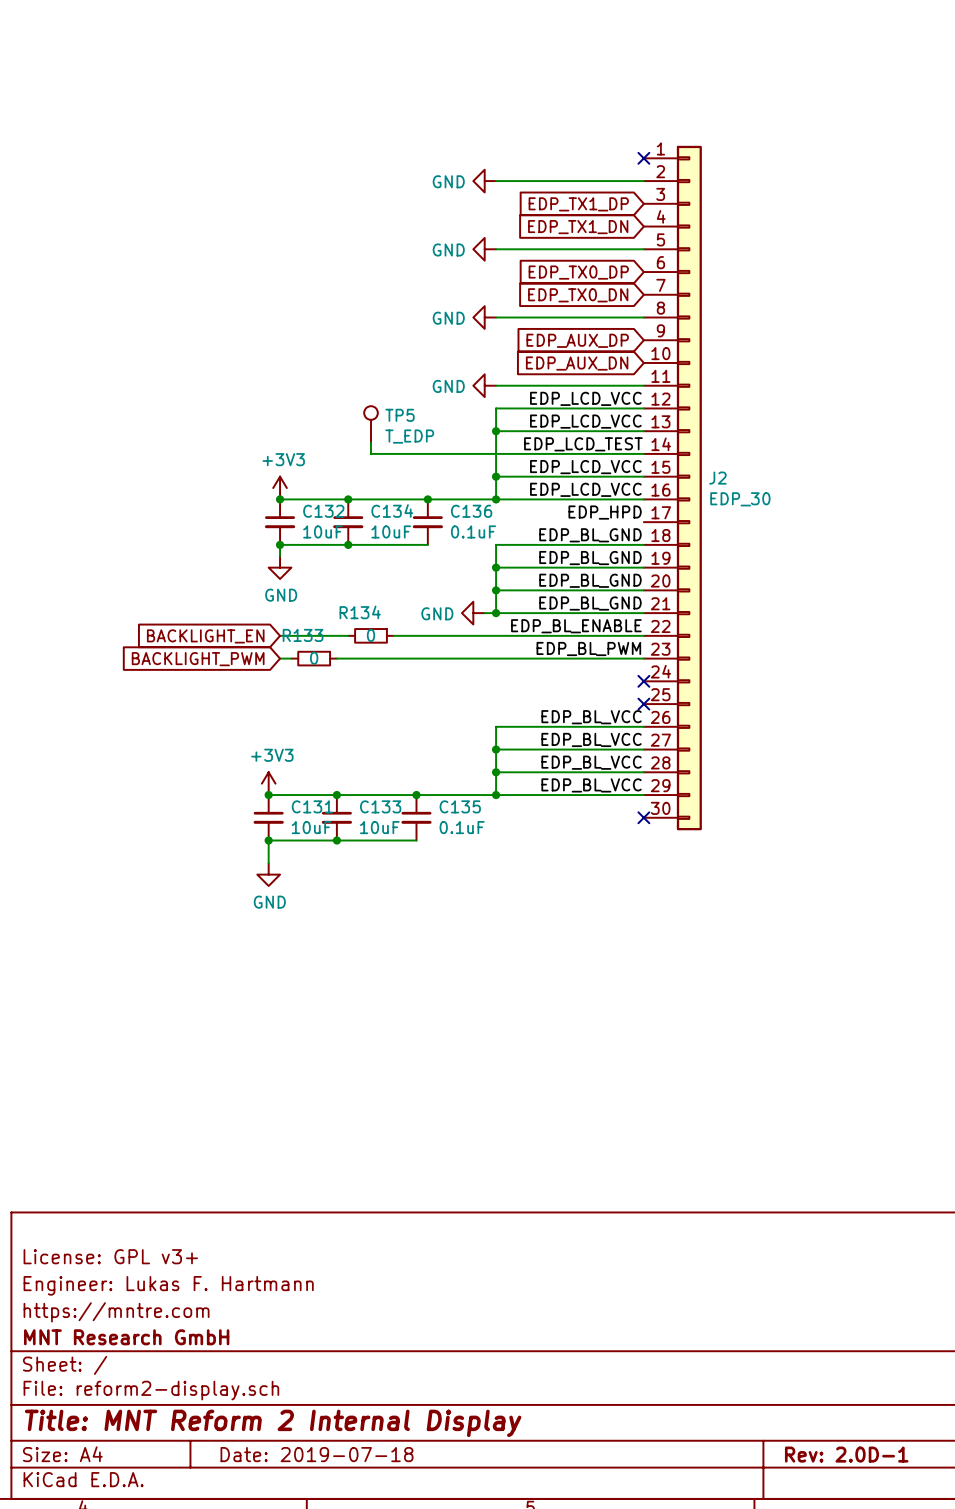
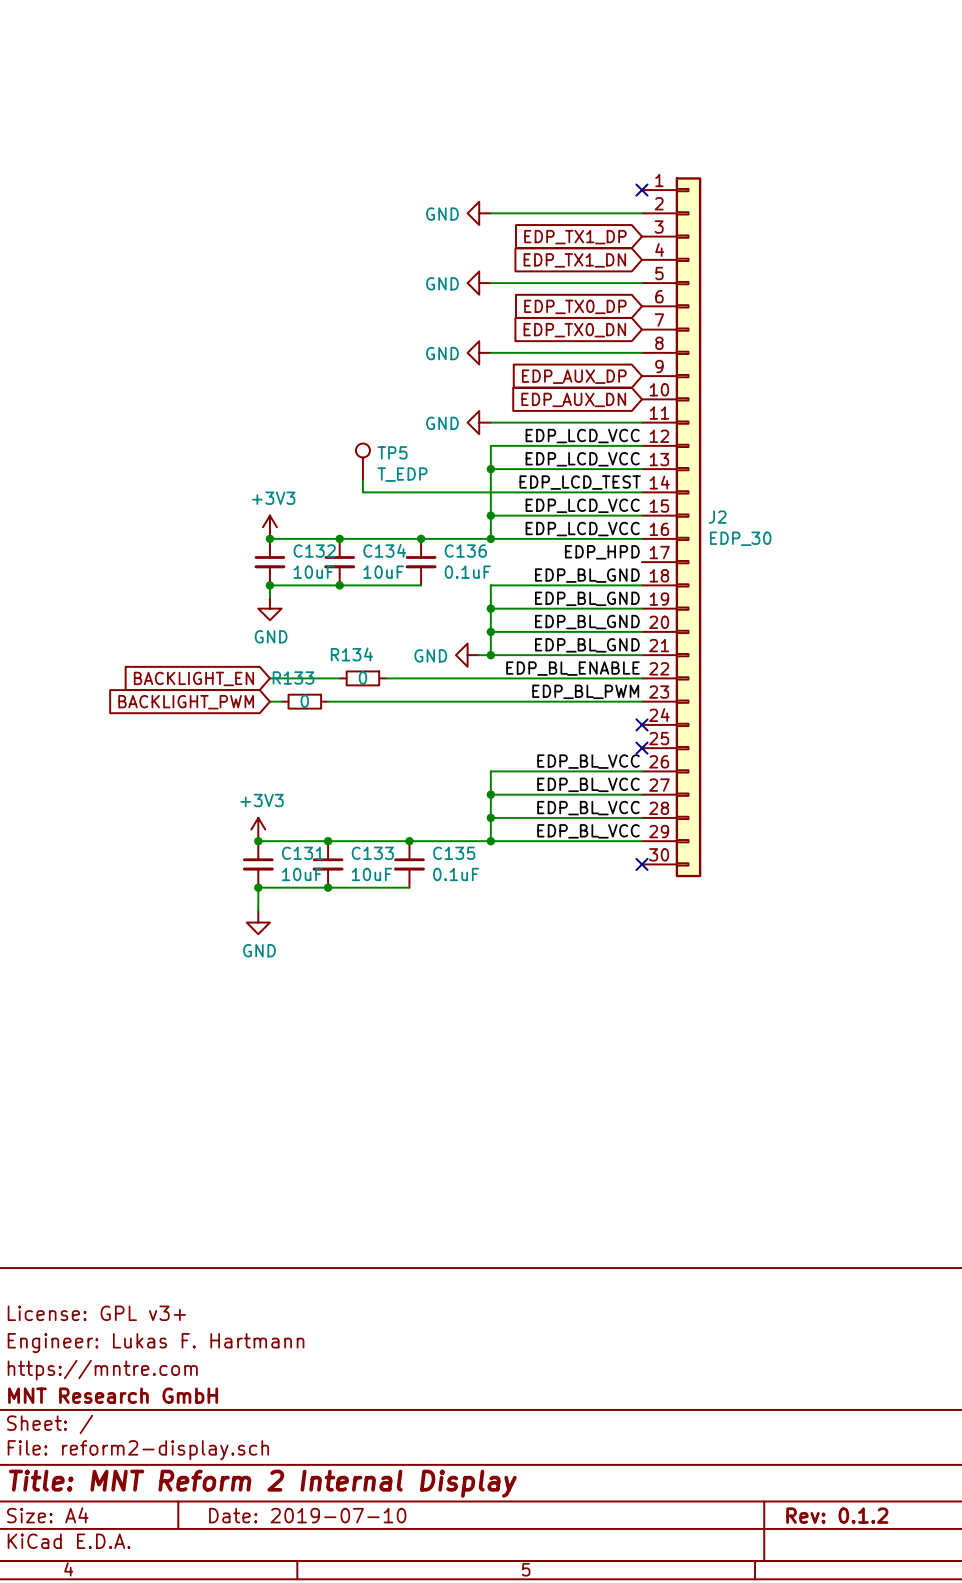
title block: Date: 2019-07-18 (317, 1454) -> Date: 2019-07-10 (307, 1515)
title block: Rev: 2.0D-1 (846, 1454) -> Rev: 0.1.2 (837, 1515)

